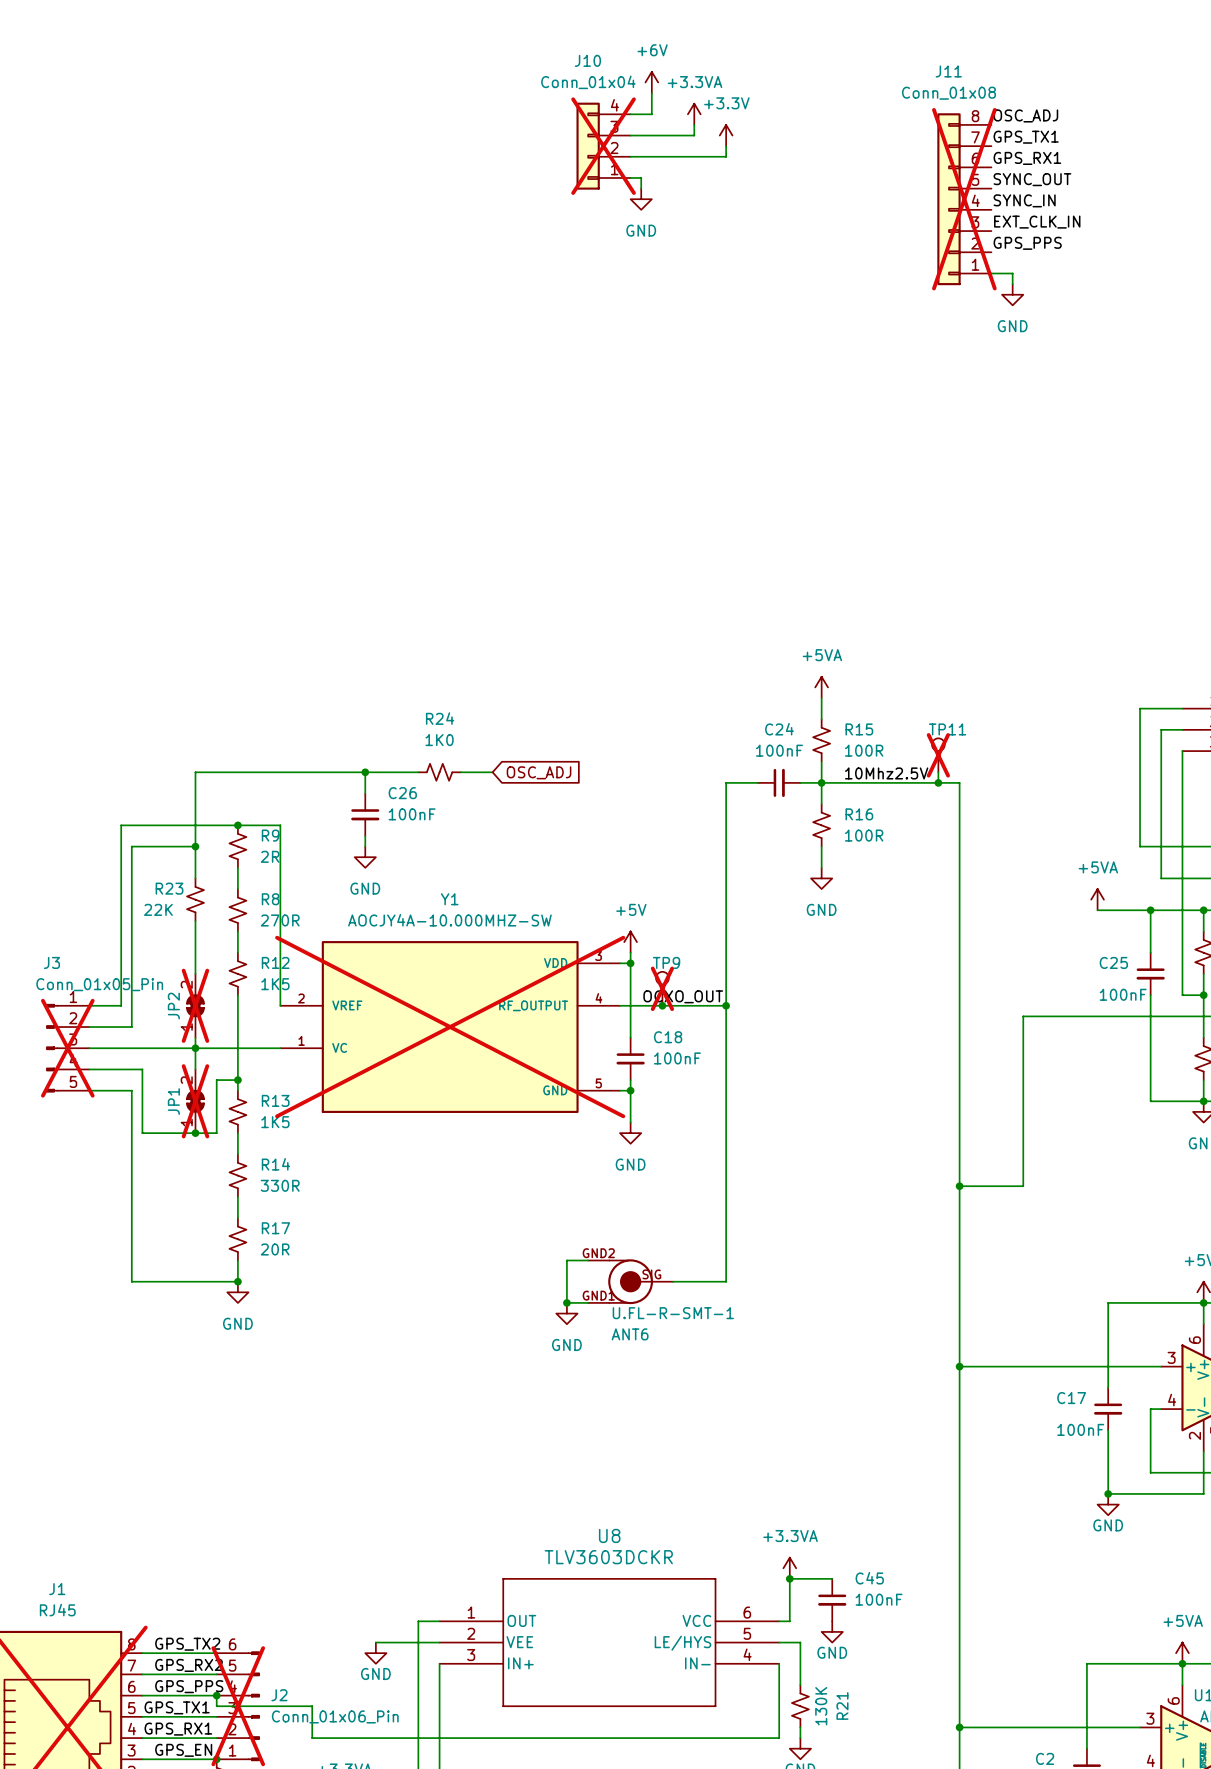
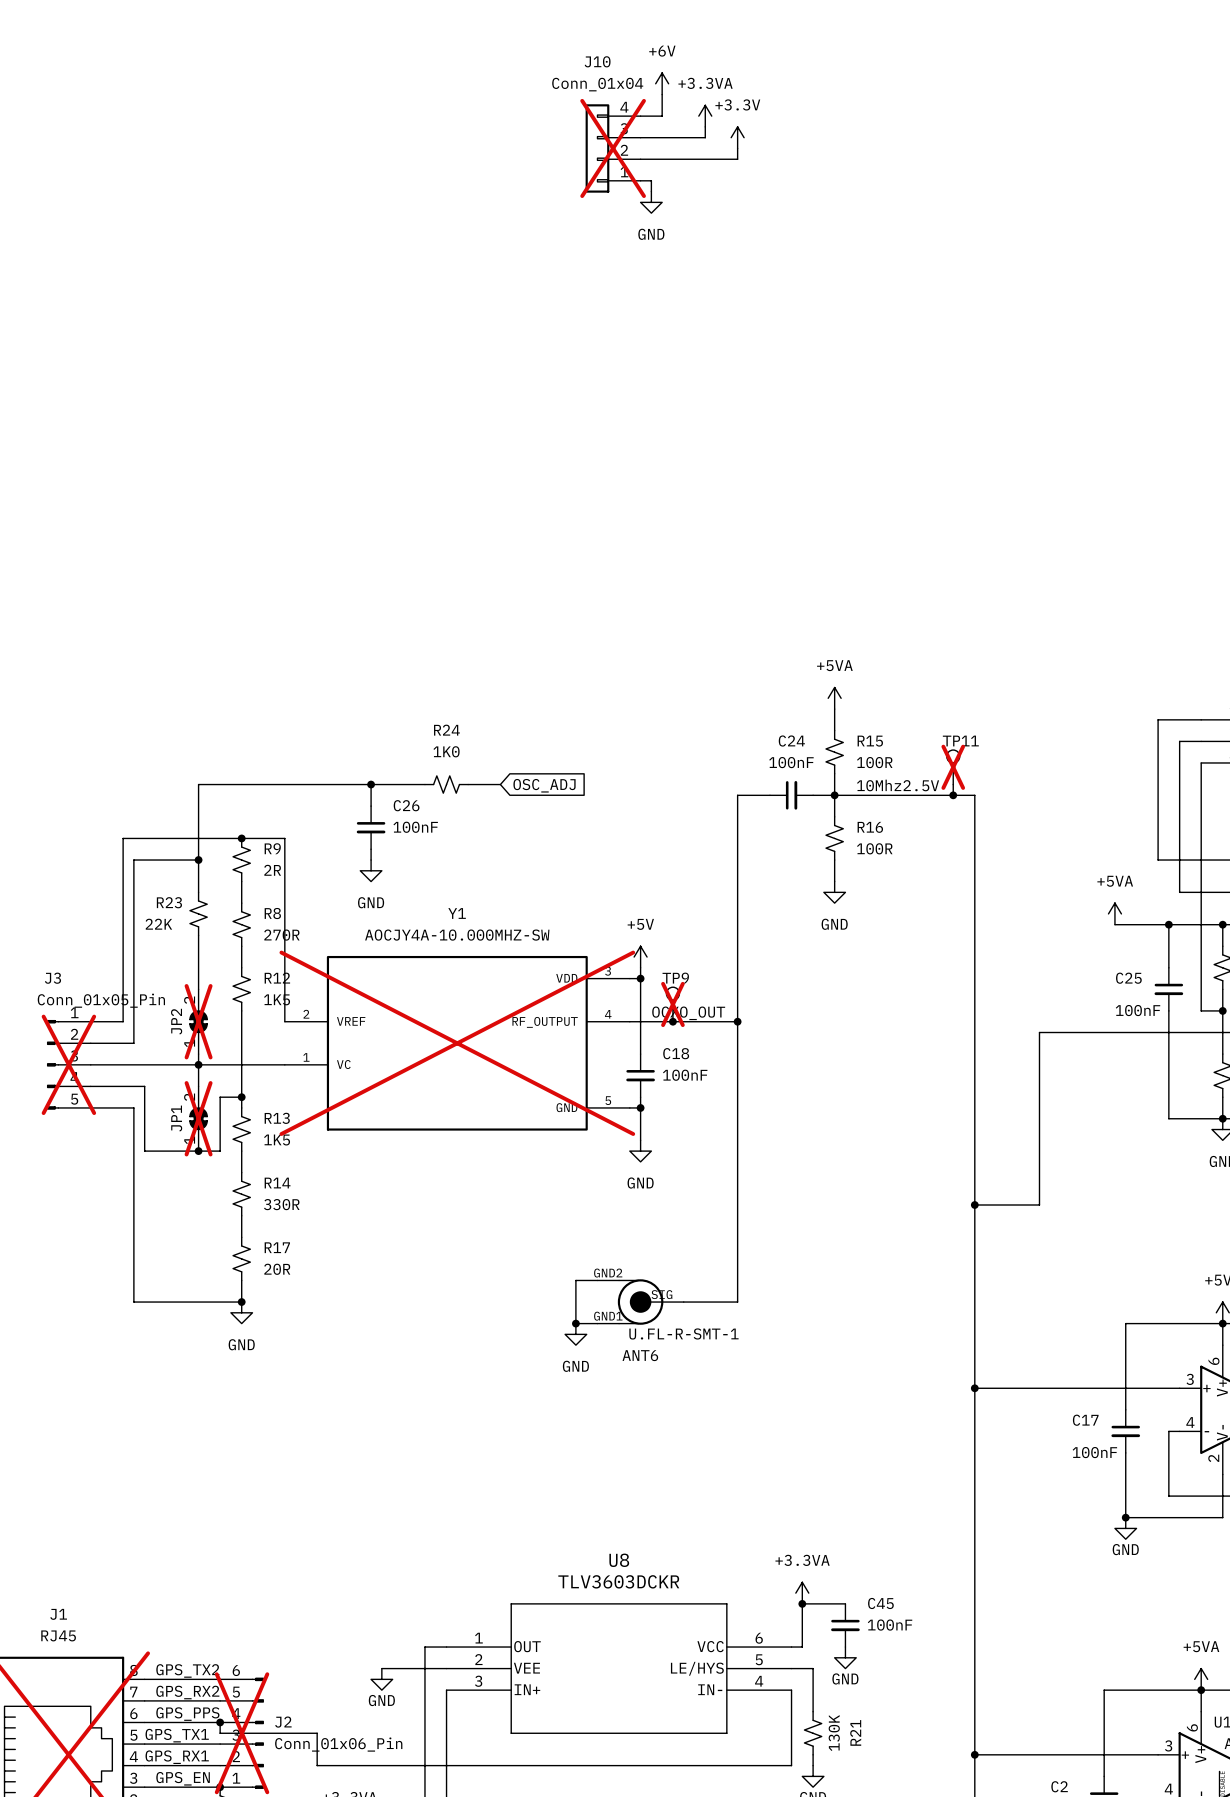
label: OSC_ADJ (1025, 115) -> none
label: GPS_TX1 (1026, 137) -> none
label: GPS_RX1 (1027, 158) -> none
label: SYNC_OUT (1032, 179) -> none
J11: Conn_01x08 (964, 199) -> none
label: SYNC_IN (1024, 200) -> none
label: EXT_CLK_IN (1037, 222) -> none
label: GPS_PPS (1027, 243) -> none
wire: (991, 273) (1012, 273) (1012, 284) -> none
power symbol: GND (1012, 294) -> none

